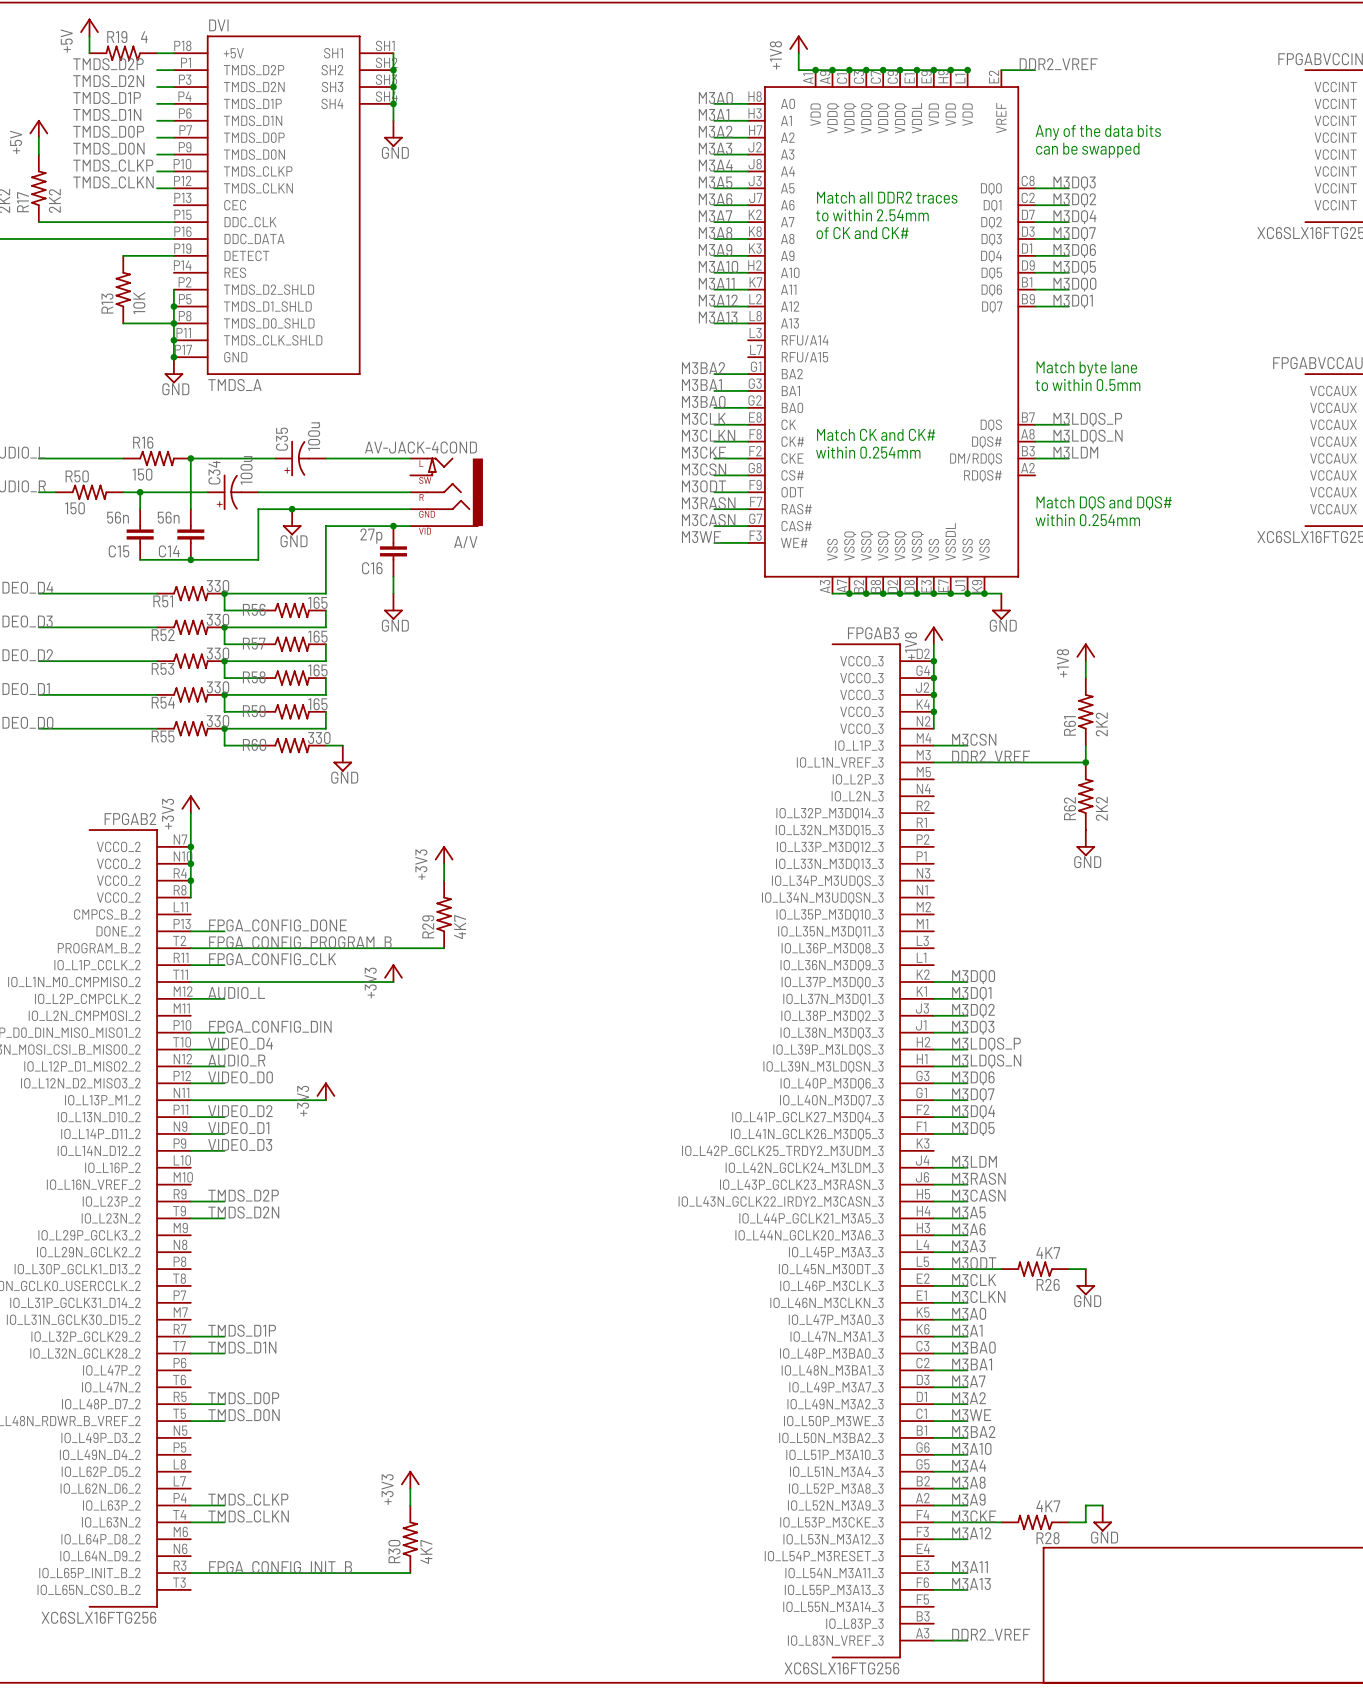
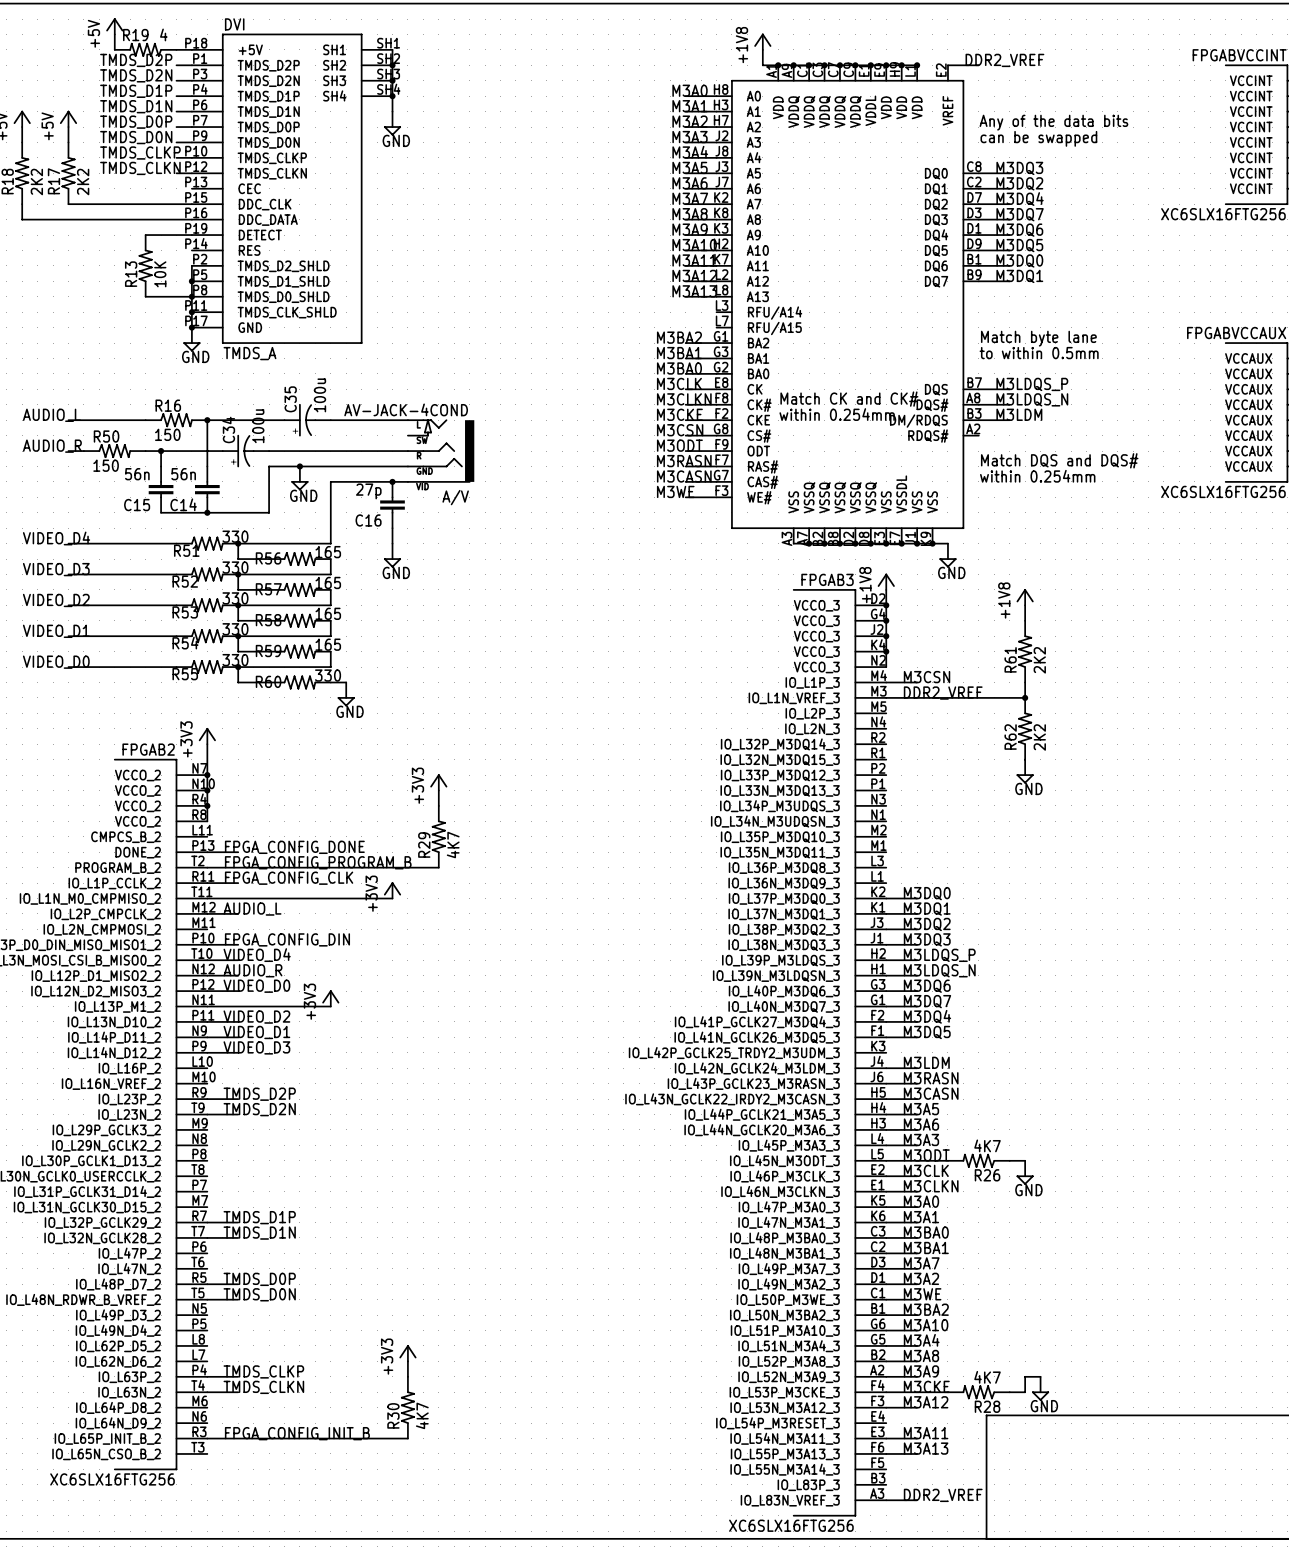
text: Match all DDR2 traces (887, 197) -> none
text: to within 2.54mm (872, 215) -> none
text: of CK and CK# (862, 233) -> none

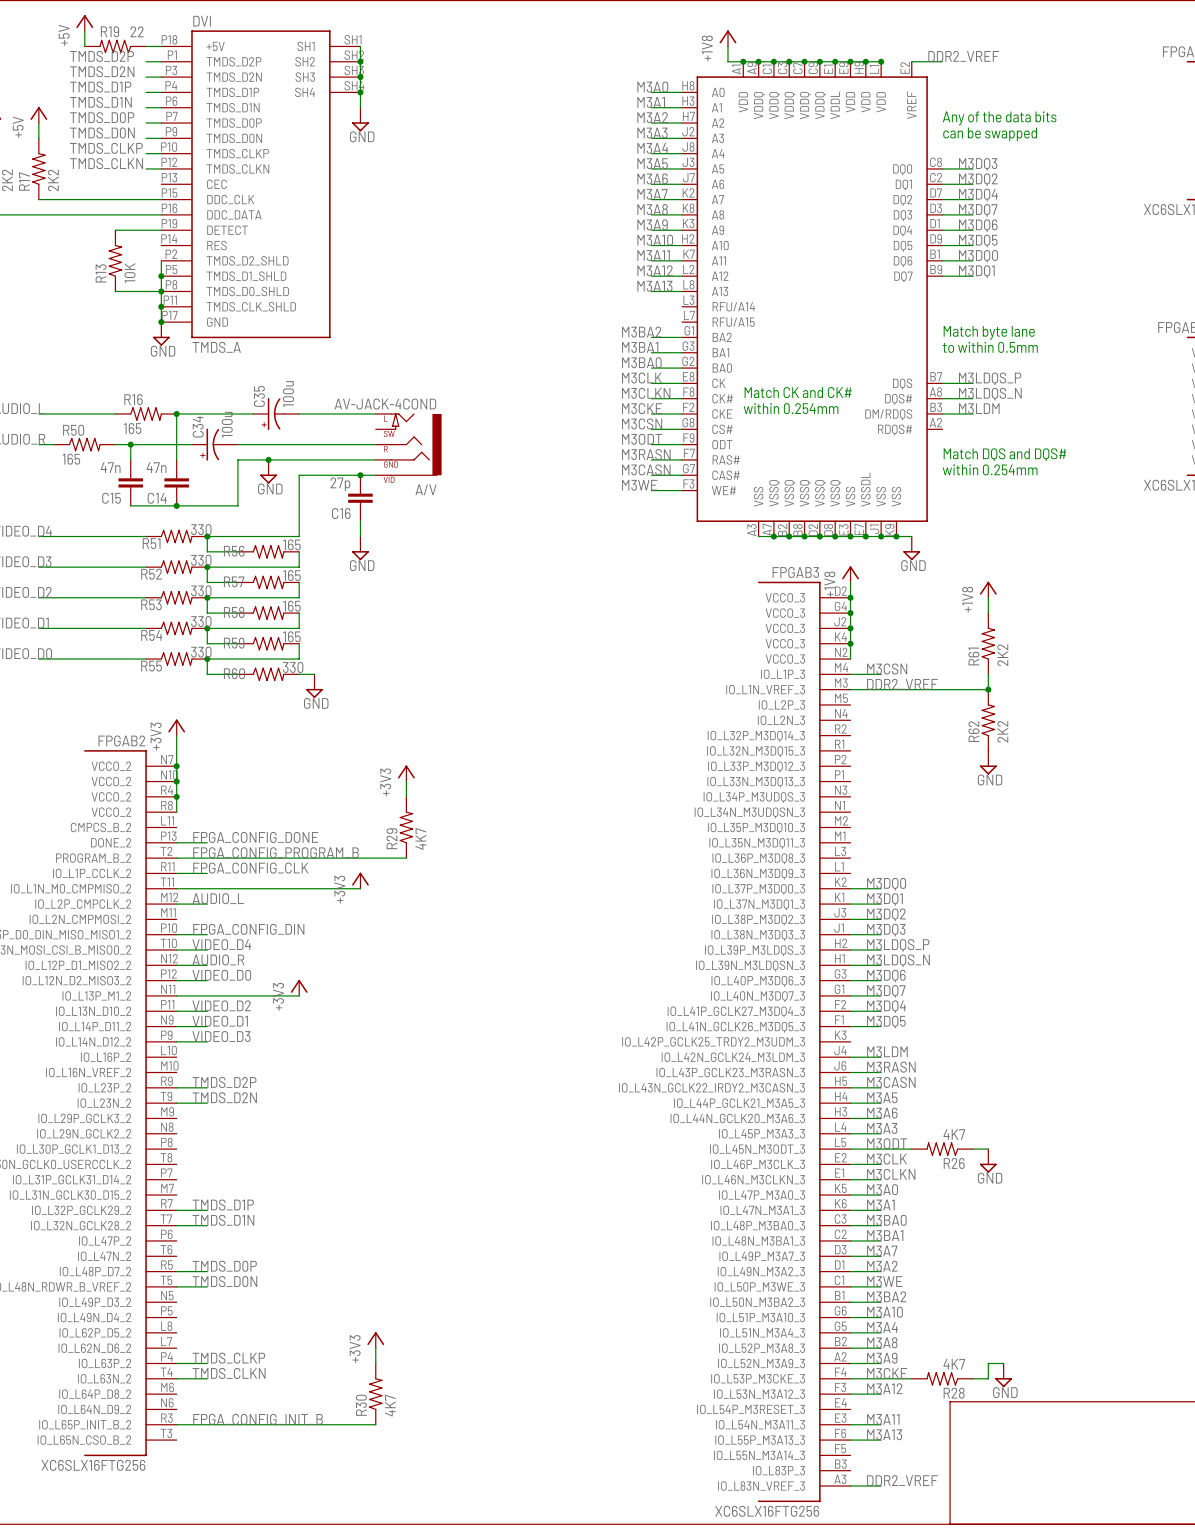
R19 value: 4 (163, 34) -> 22 (137, 31)
R16 value: 150 (167, 434) -> 165 (132, 428)
R50 value: 150 (106, 465) -> 165 (71, 459)
C15 value: 56n (137, 474) -> 47n (110, 467)
C14 value: 56n (183, 474) -> 47n (156, 467)

